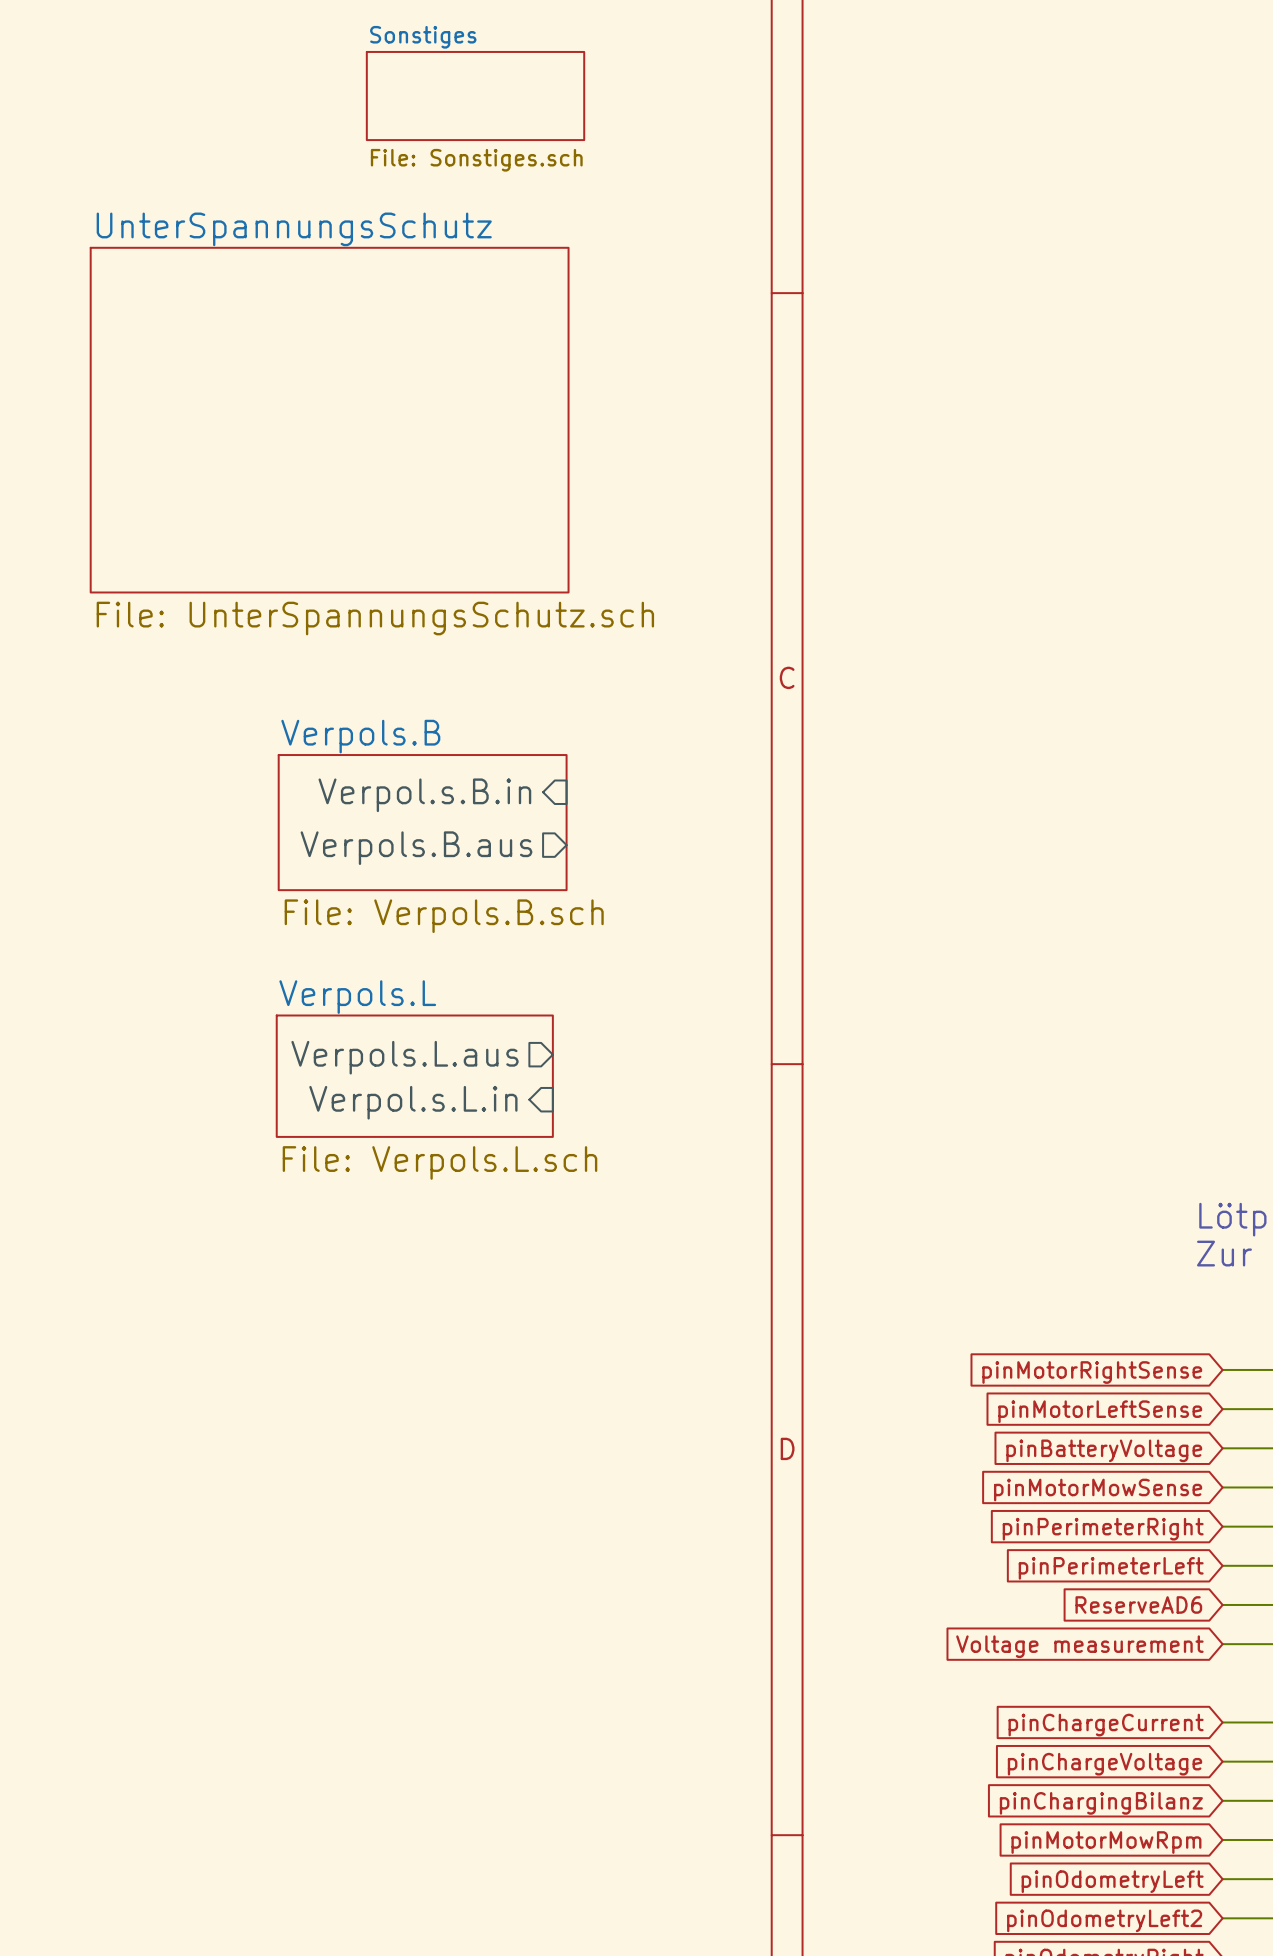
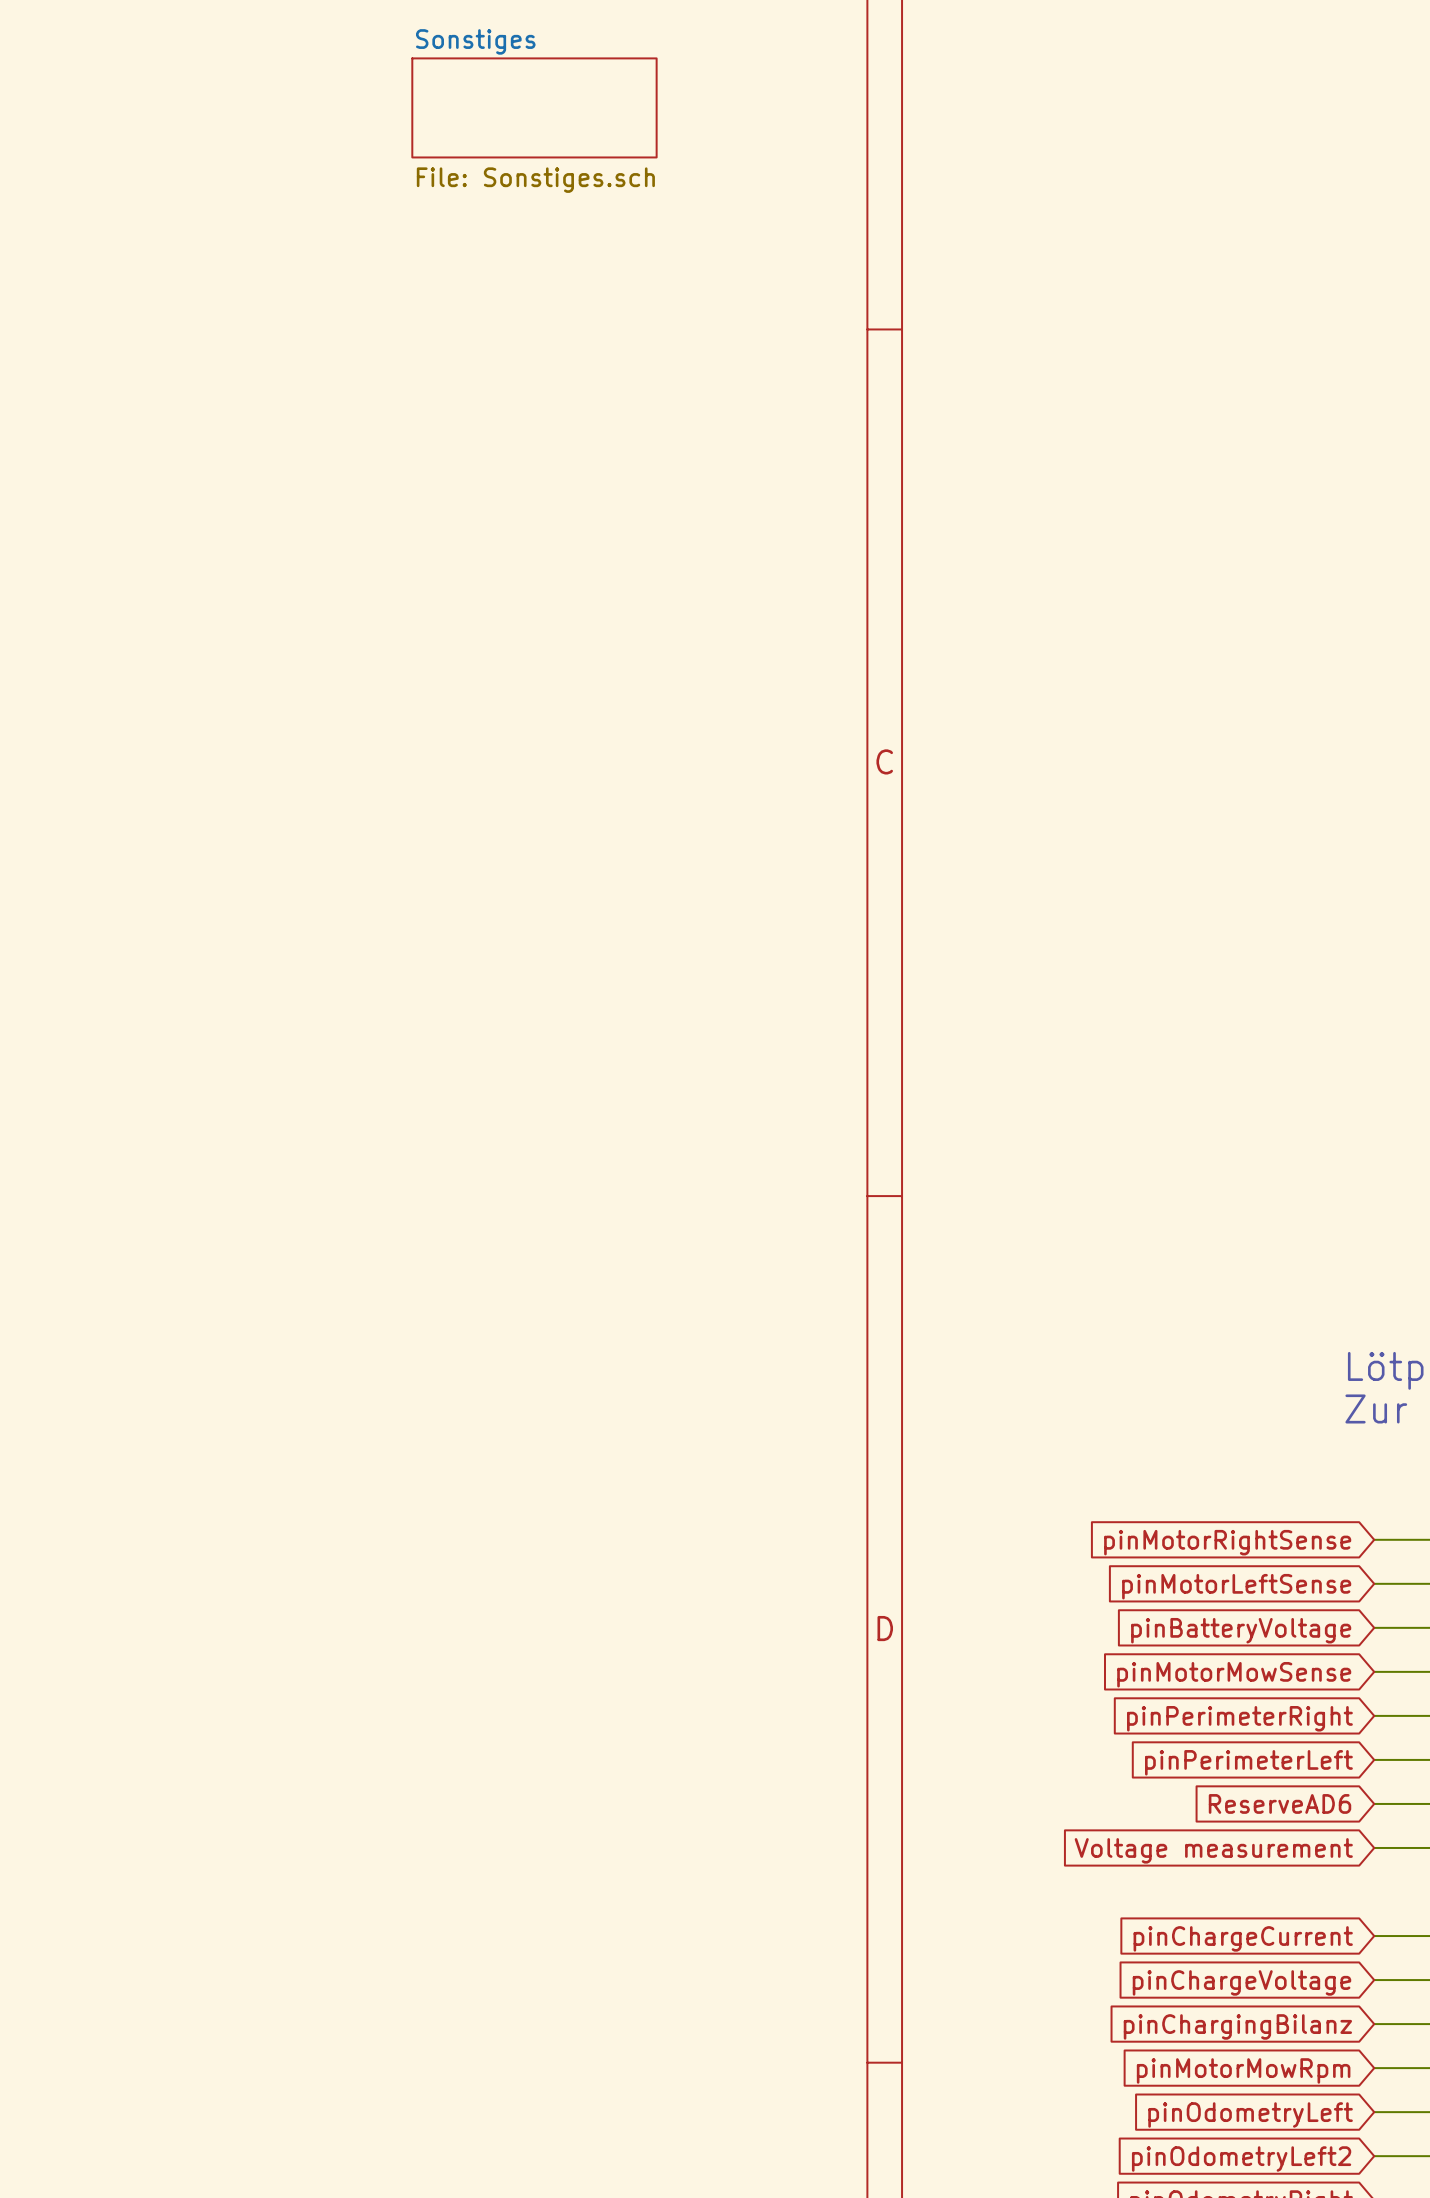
sheet UnterSpannungsSchutz: File: UnterSpannungsSchutz.sch (329, 420) -> none
sheet pin: Verpol.s.B.in (424, 795) -> none
sheet Verpols.B: File: Verpols.B.sch (422, 822) -> none
sheet pin: Verpols.B.aus (416, 848) -> none
sheet pin: Verpols.L.aus (405, 1057) -> none
sheet Verpols.L: File: Verpols.L.sch (414, 1076) -> none
sheet pin: Verpol.s.L.in (413, 1102) -> none

